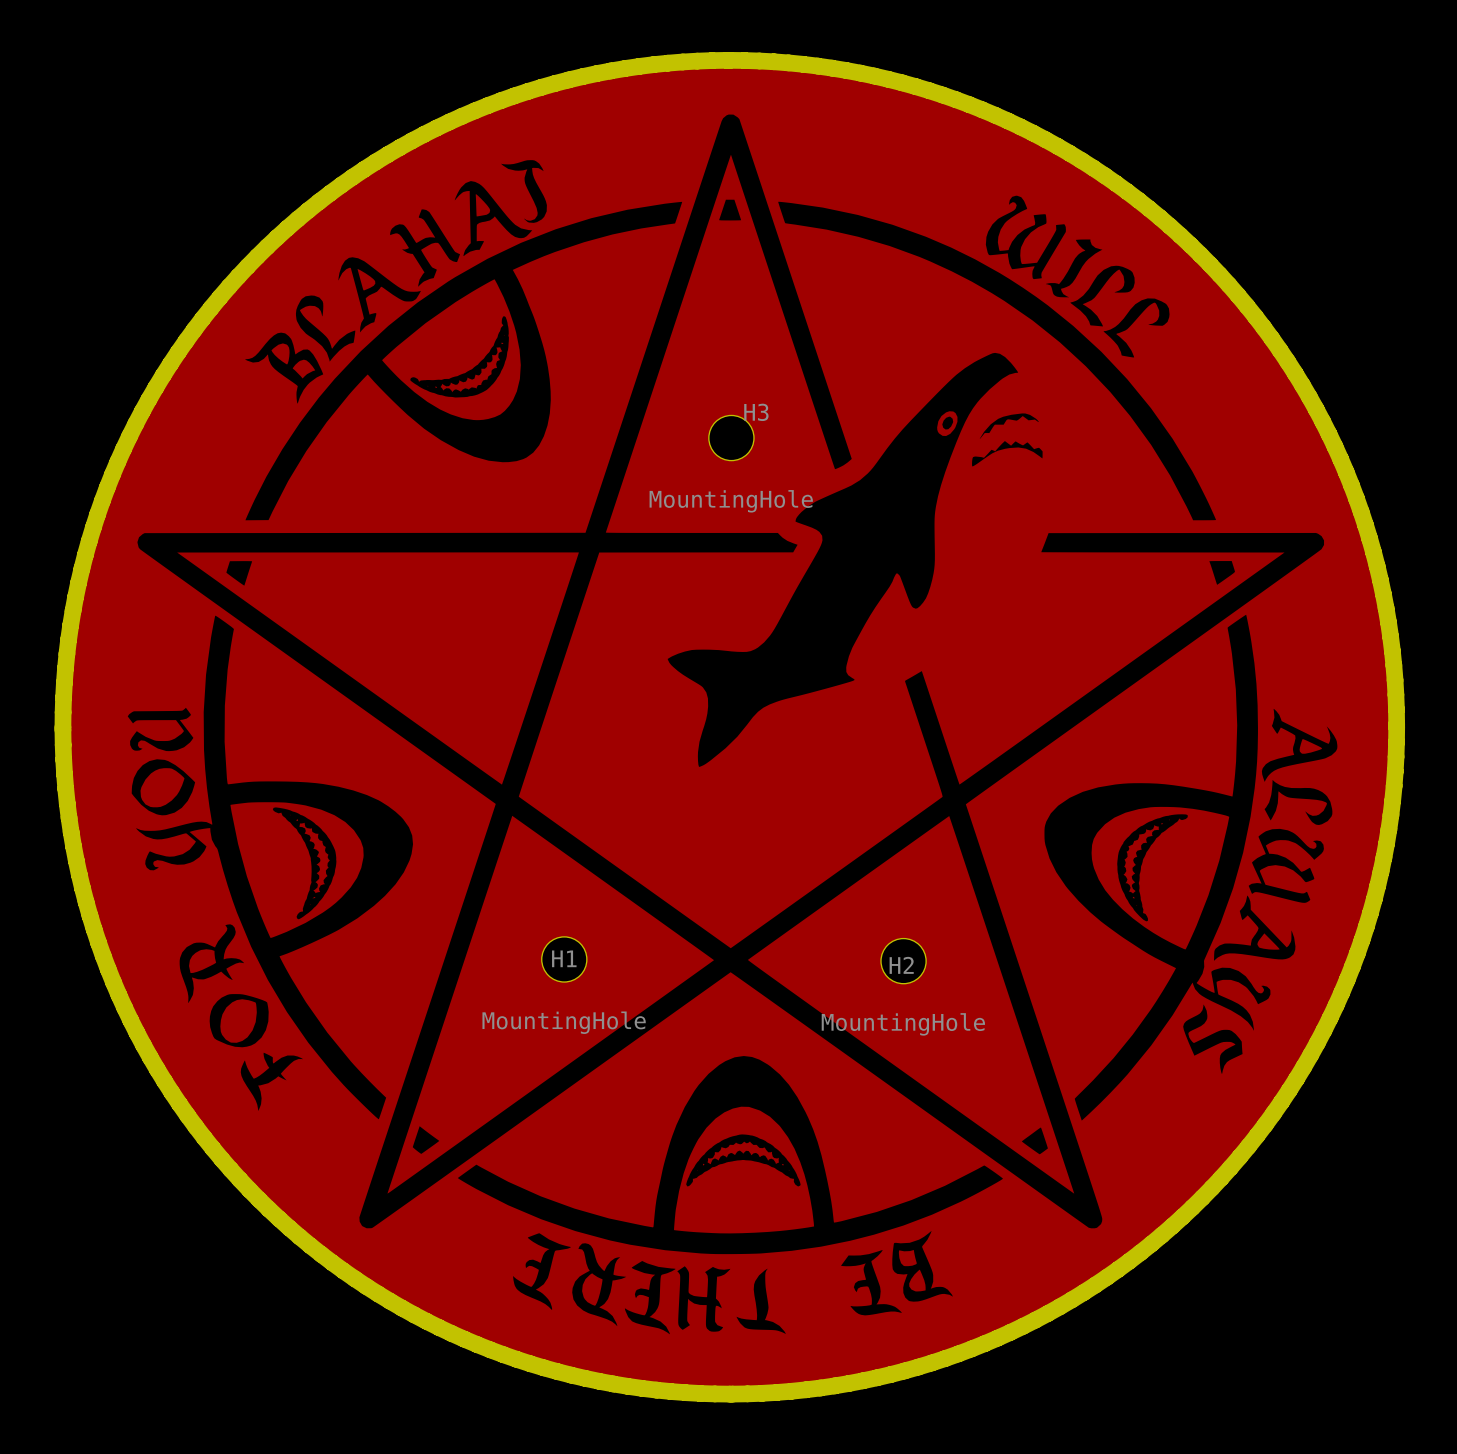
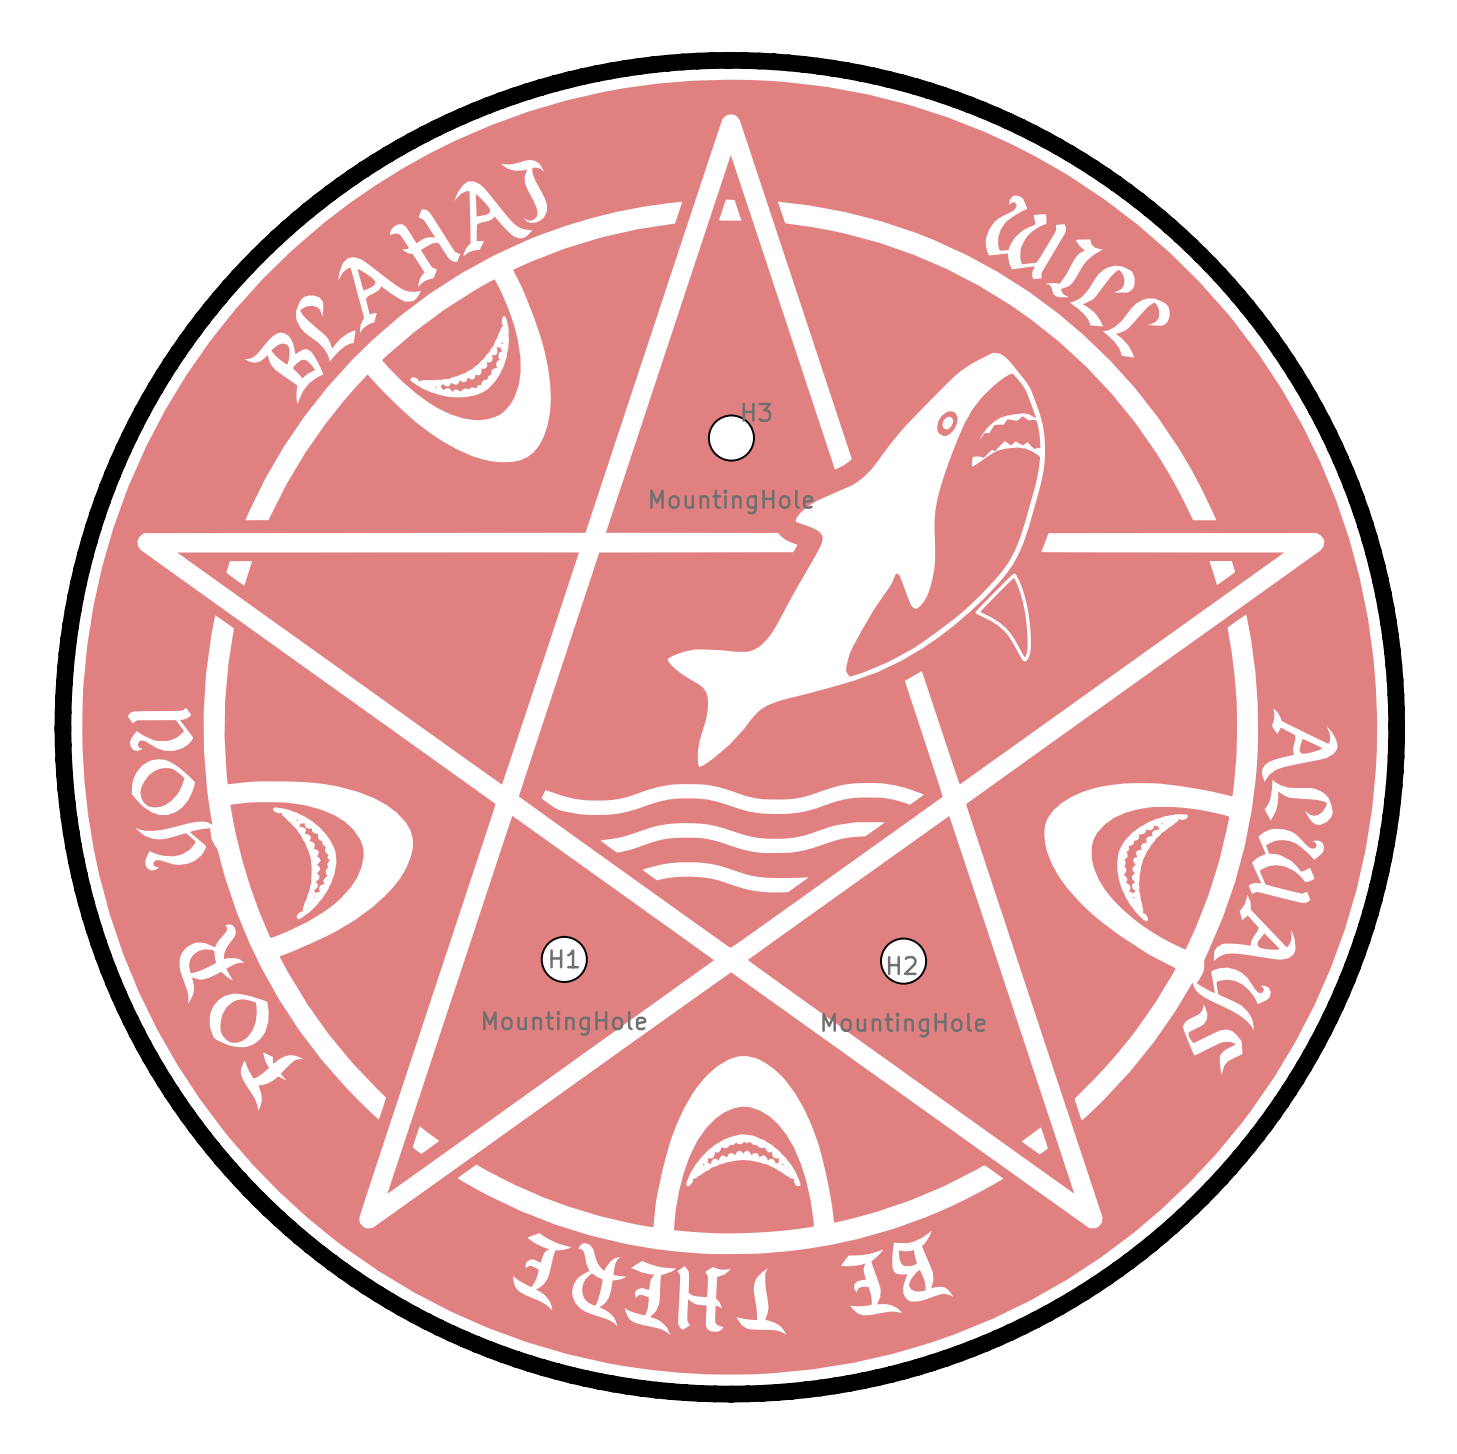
drawing shape: [63, 61, 1396, 1394] -> [82, 79, 1378, 1375]

